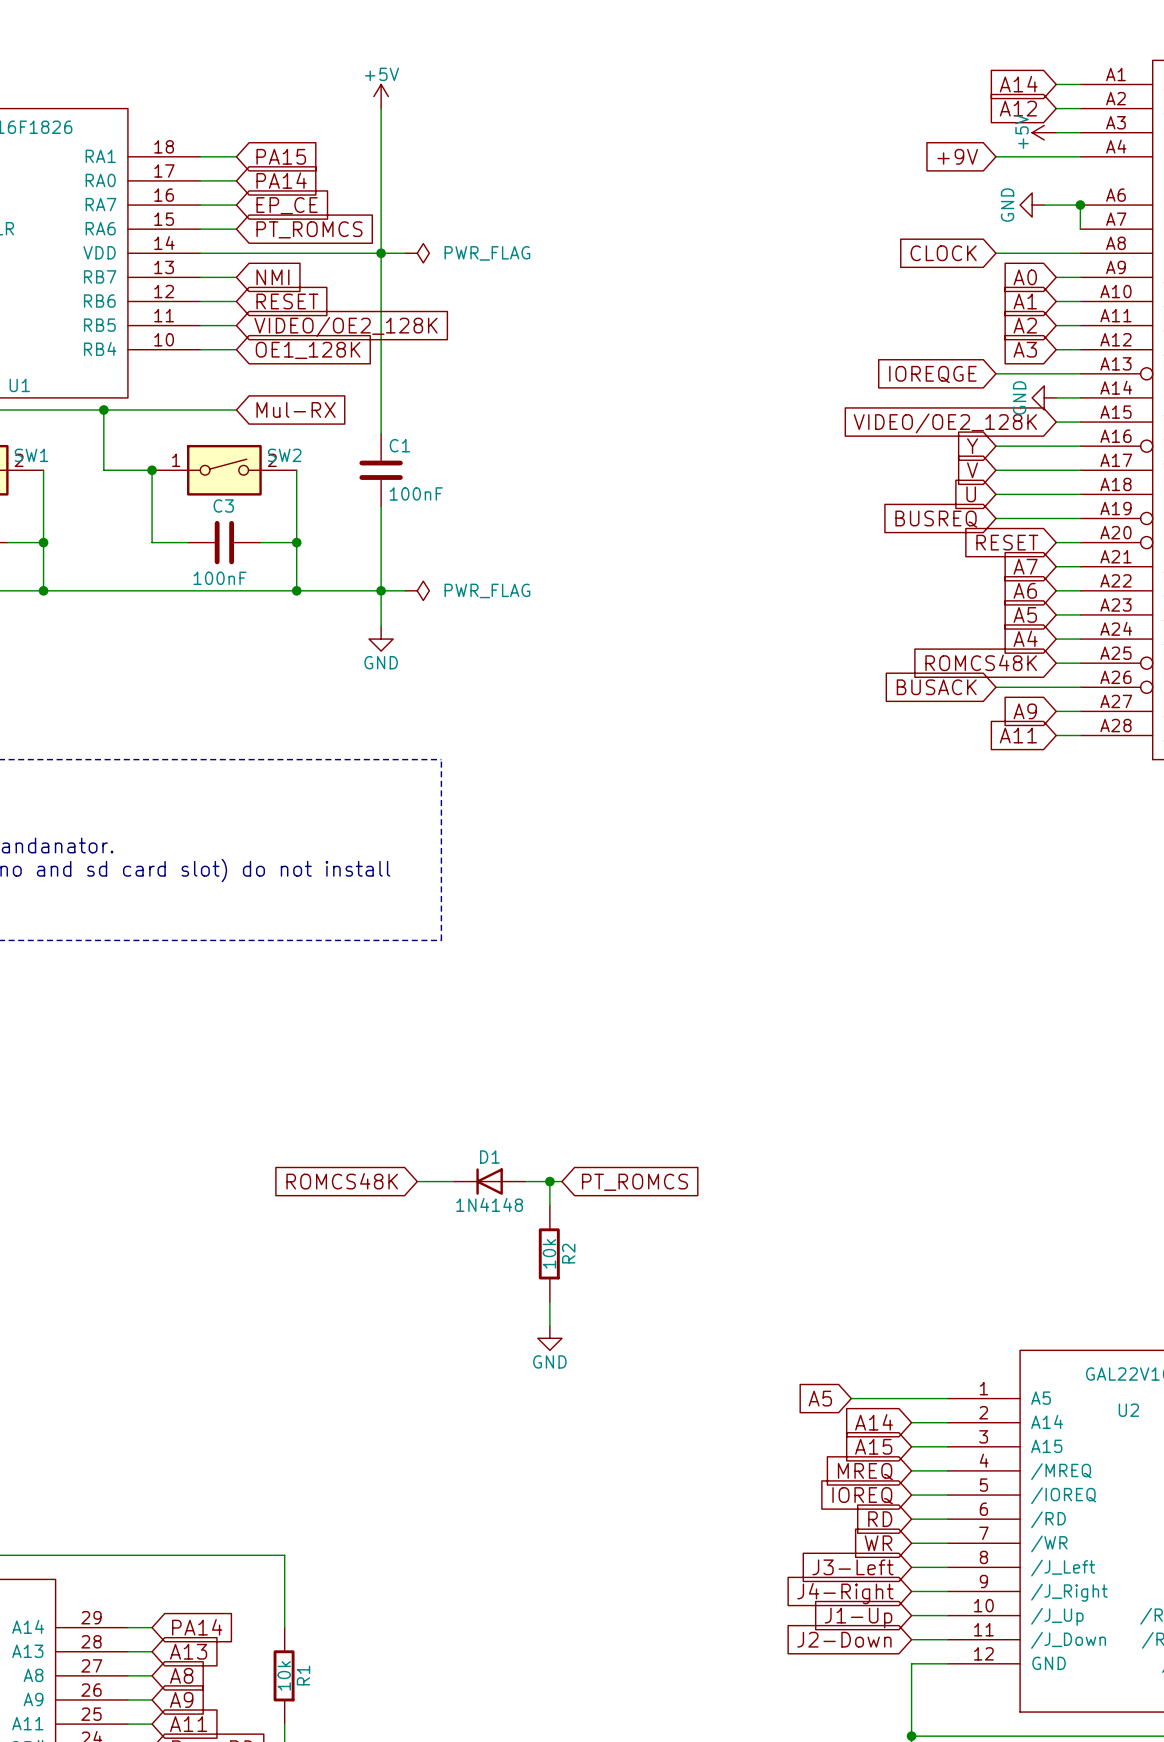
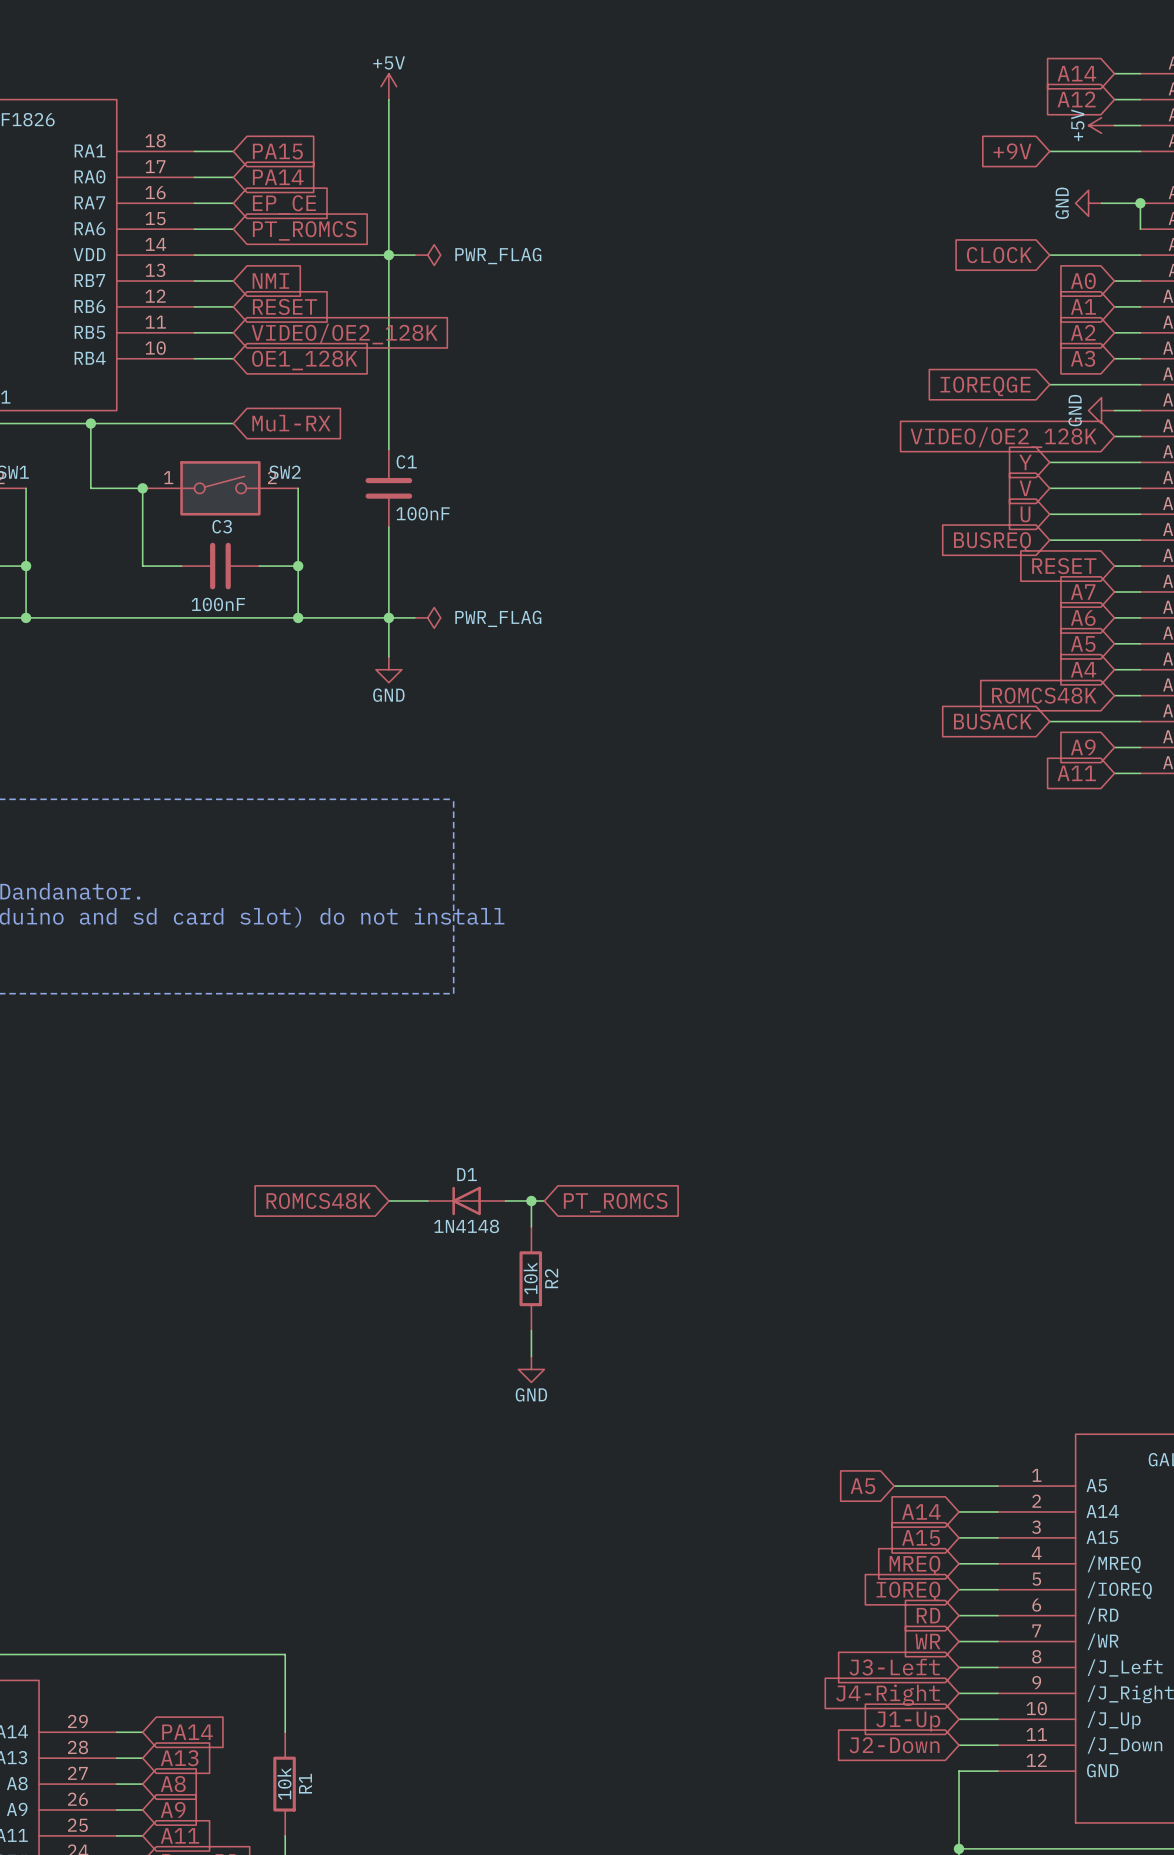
junction: none -> (531, 1201)
global label position: ROMCS48K (342, 1181) -> ROMCS48K (318, 1201)
wire: (417, 1181) (453, 1181) -> (388, 1201) (427, 1201)
D1 position: (489, 1181) -> (466, 1201)
wire: (525, 1181) (561, 1181) -> (505, 1201) (544, 1201)
wire: (549, 1181) (549, 1205) -> (531, 1201) (531, 1226)
junction: (549, 1181) -> none
global label position: PT_ROMCS (634, 1182) -> PT_ROMCS (615, 1202)
R2 position: (549, 1253) -> (530, 1278)
wire: (549, 1302) (549, 1326) -> (531, 1330) (531, 1356)
power symbol position: GND (549, 1338) -> GND (531, 1369)

